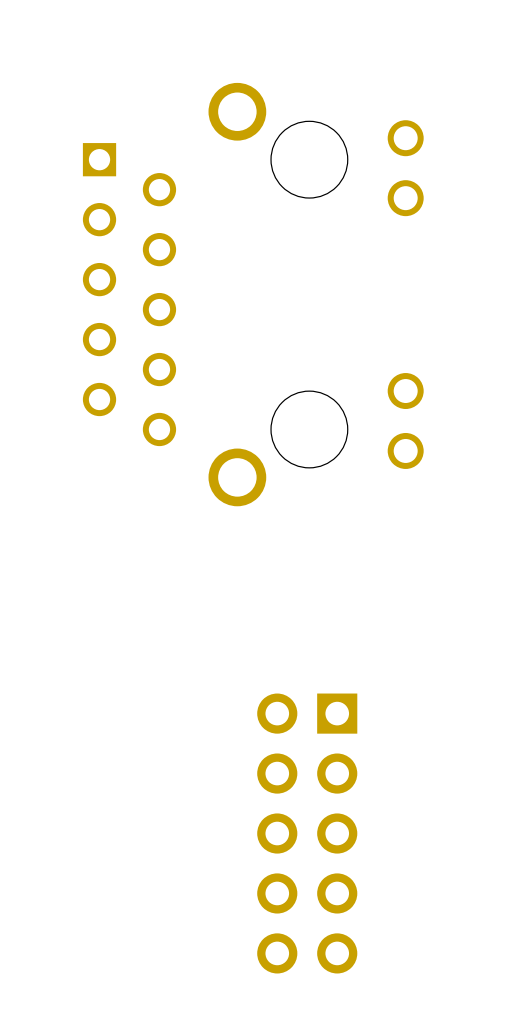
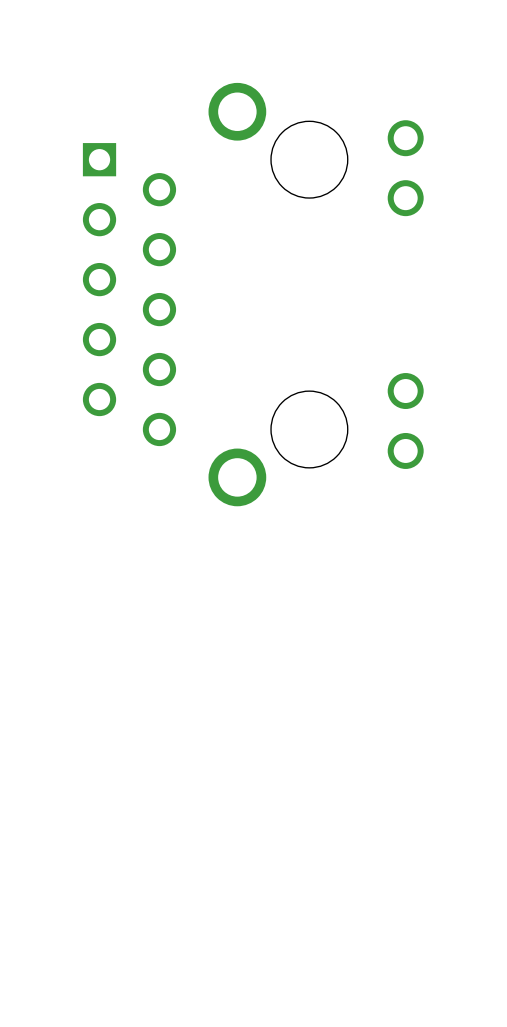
part: (307, 833) -> none

